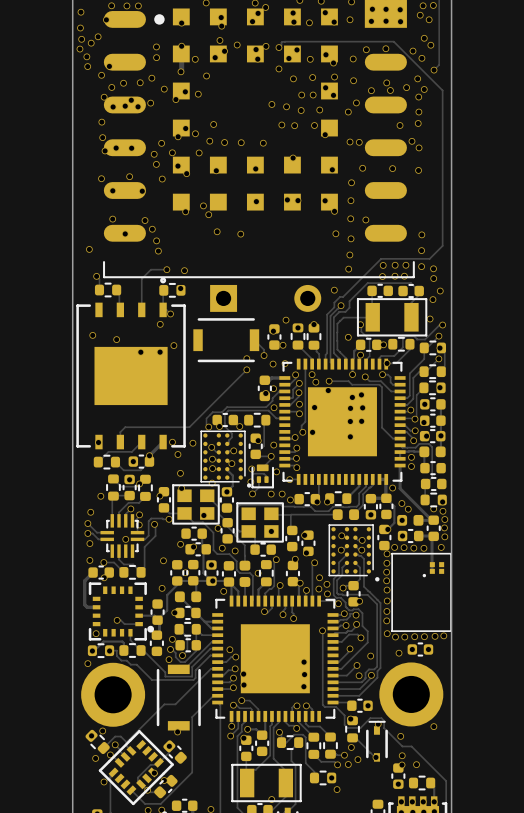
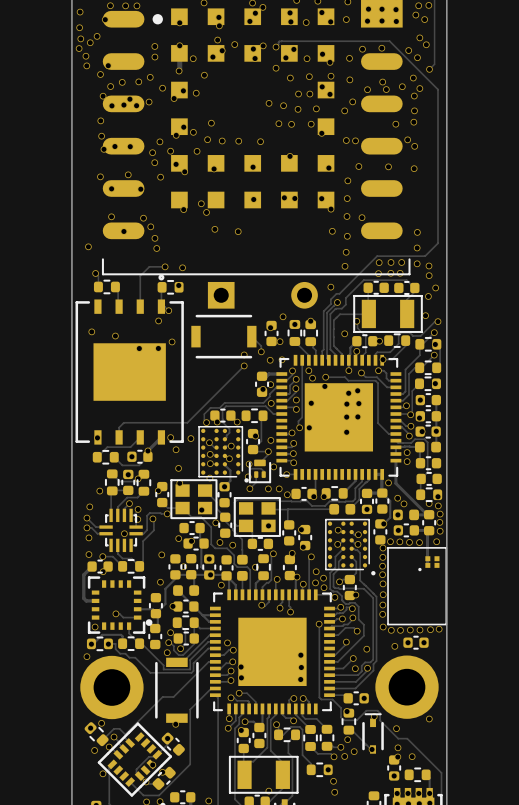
via: none -> (334, 792)

